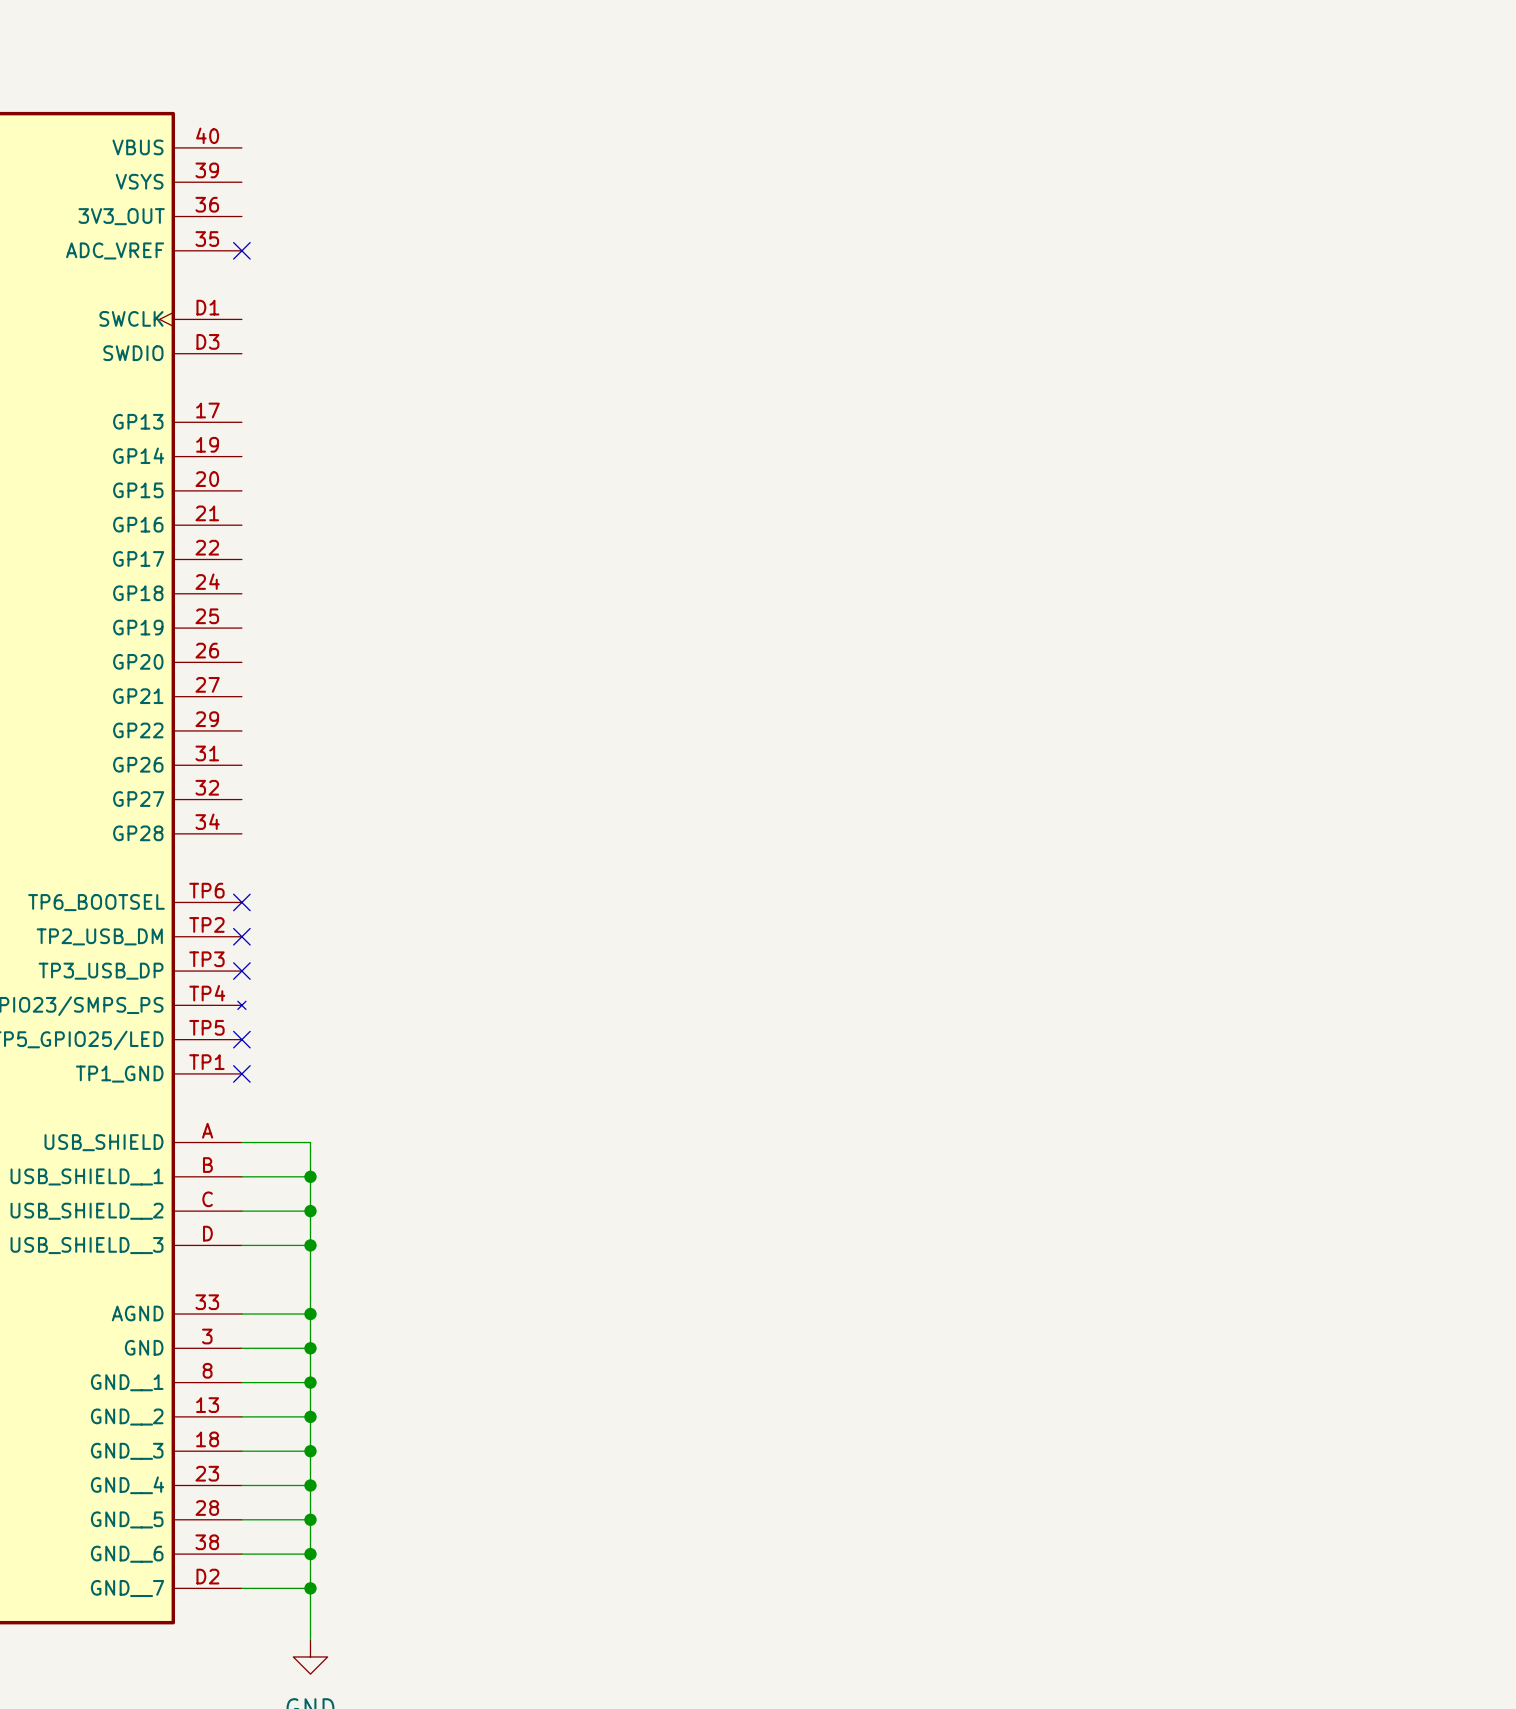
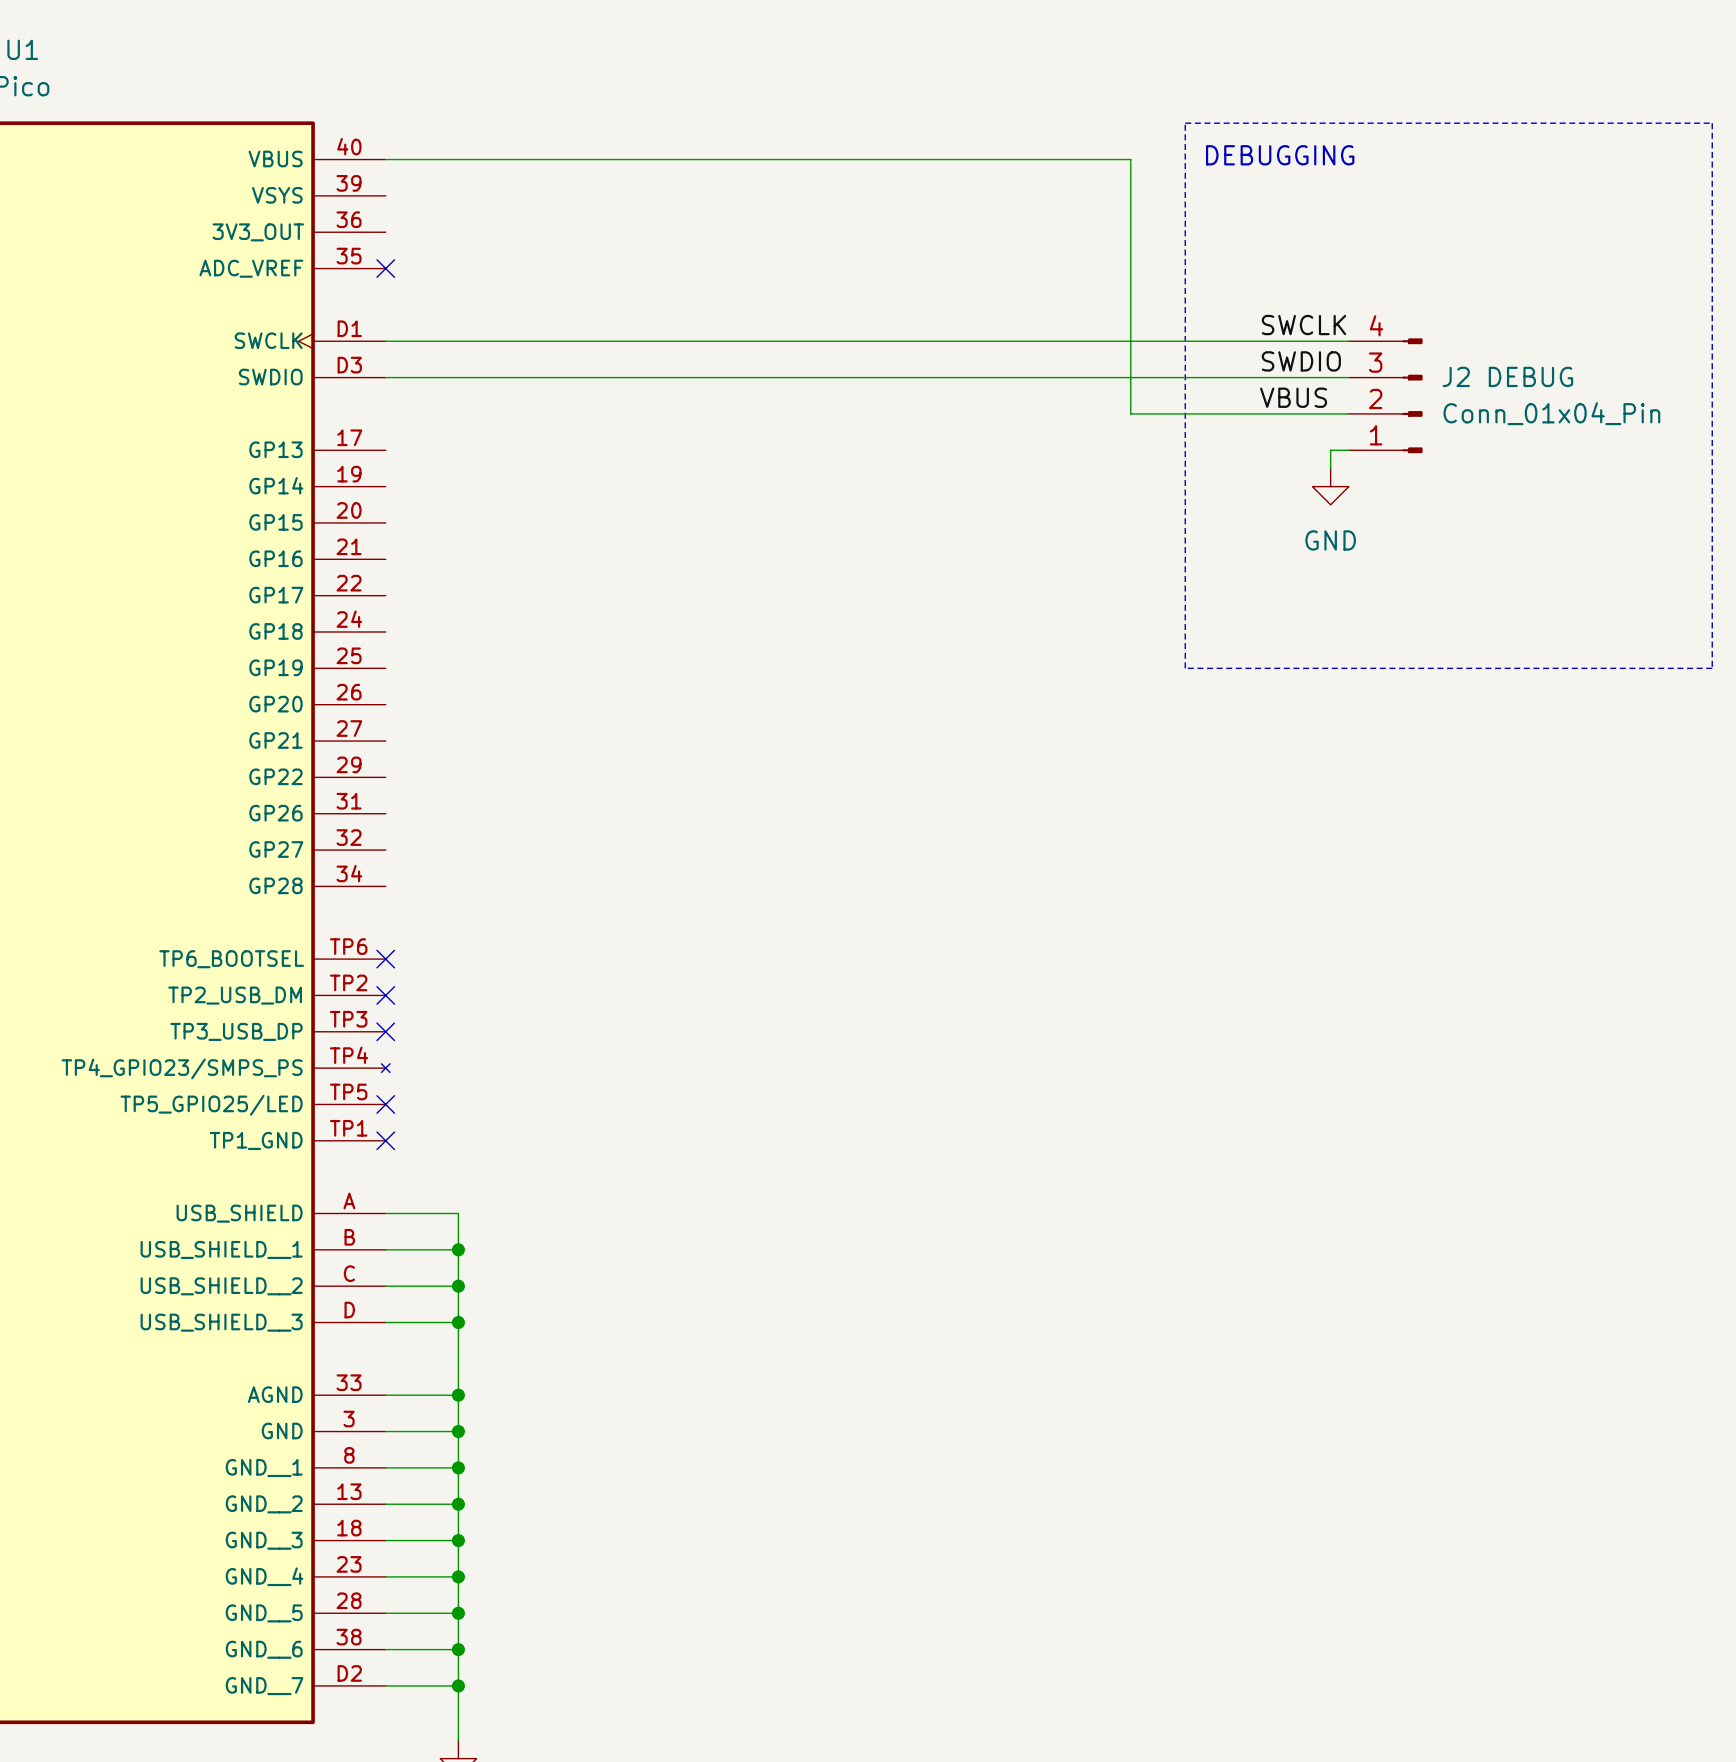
line: none -> (1185, 123) (1712, 123) (1712, 668) (1185, 668) (1185, 123)
text: none -> DEBUGGING (1280, 155)
wire: none -> (385, 159) (1130, 159) (1130, 413) (1348, 413)
label: none -> SWCLK (1303, 325)
wire: none -> (385, 341) (1348, 341)
label: none -> SWDIO (1301, 361)
wire: none -> (385, 377) (1348, 377)
J2: none -> Conn_01x04_Pin (1385, 395)
label: none -> VBUS (1293, 397)
wire: none -> (1348, 450) (1330, 450) (1330, 468)
power symbol: none -> GND (1330, 486)

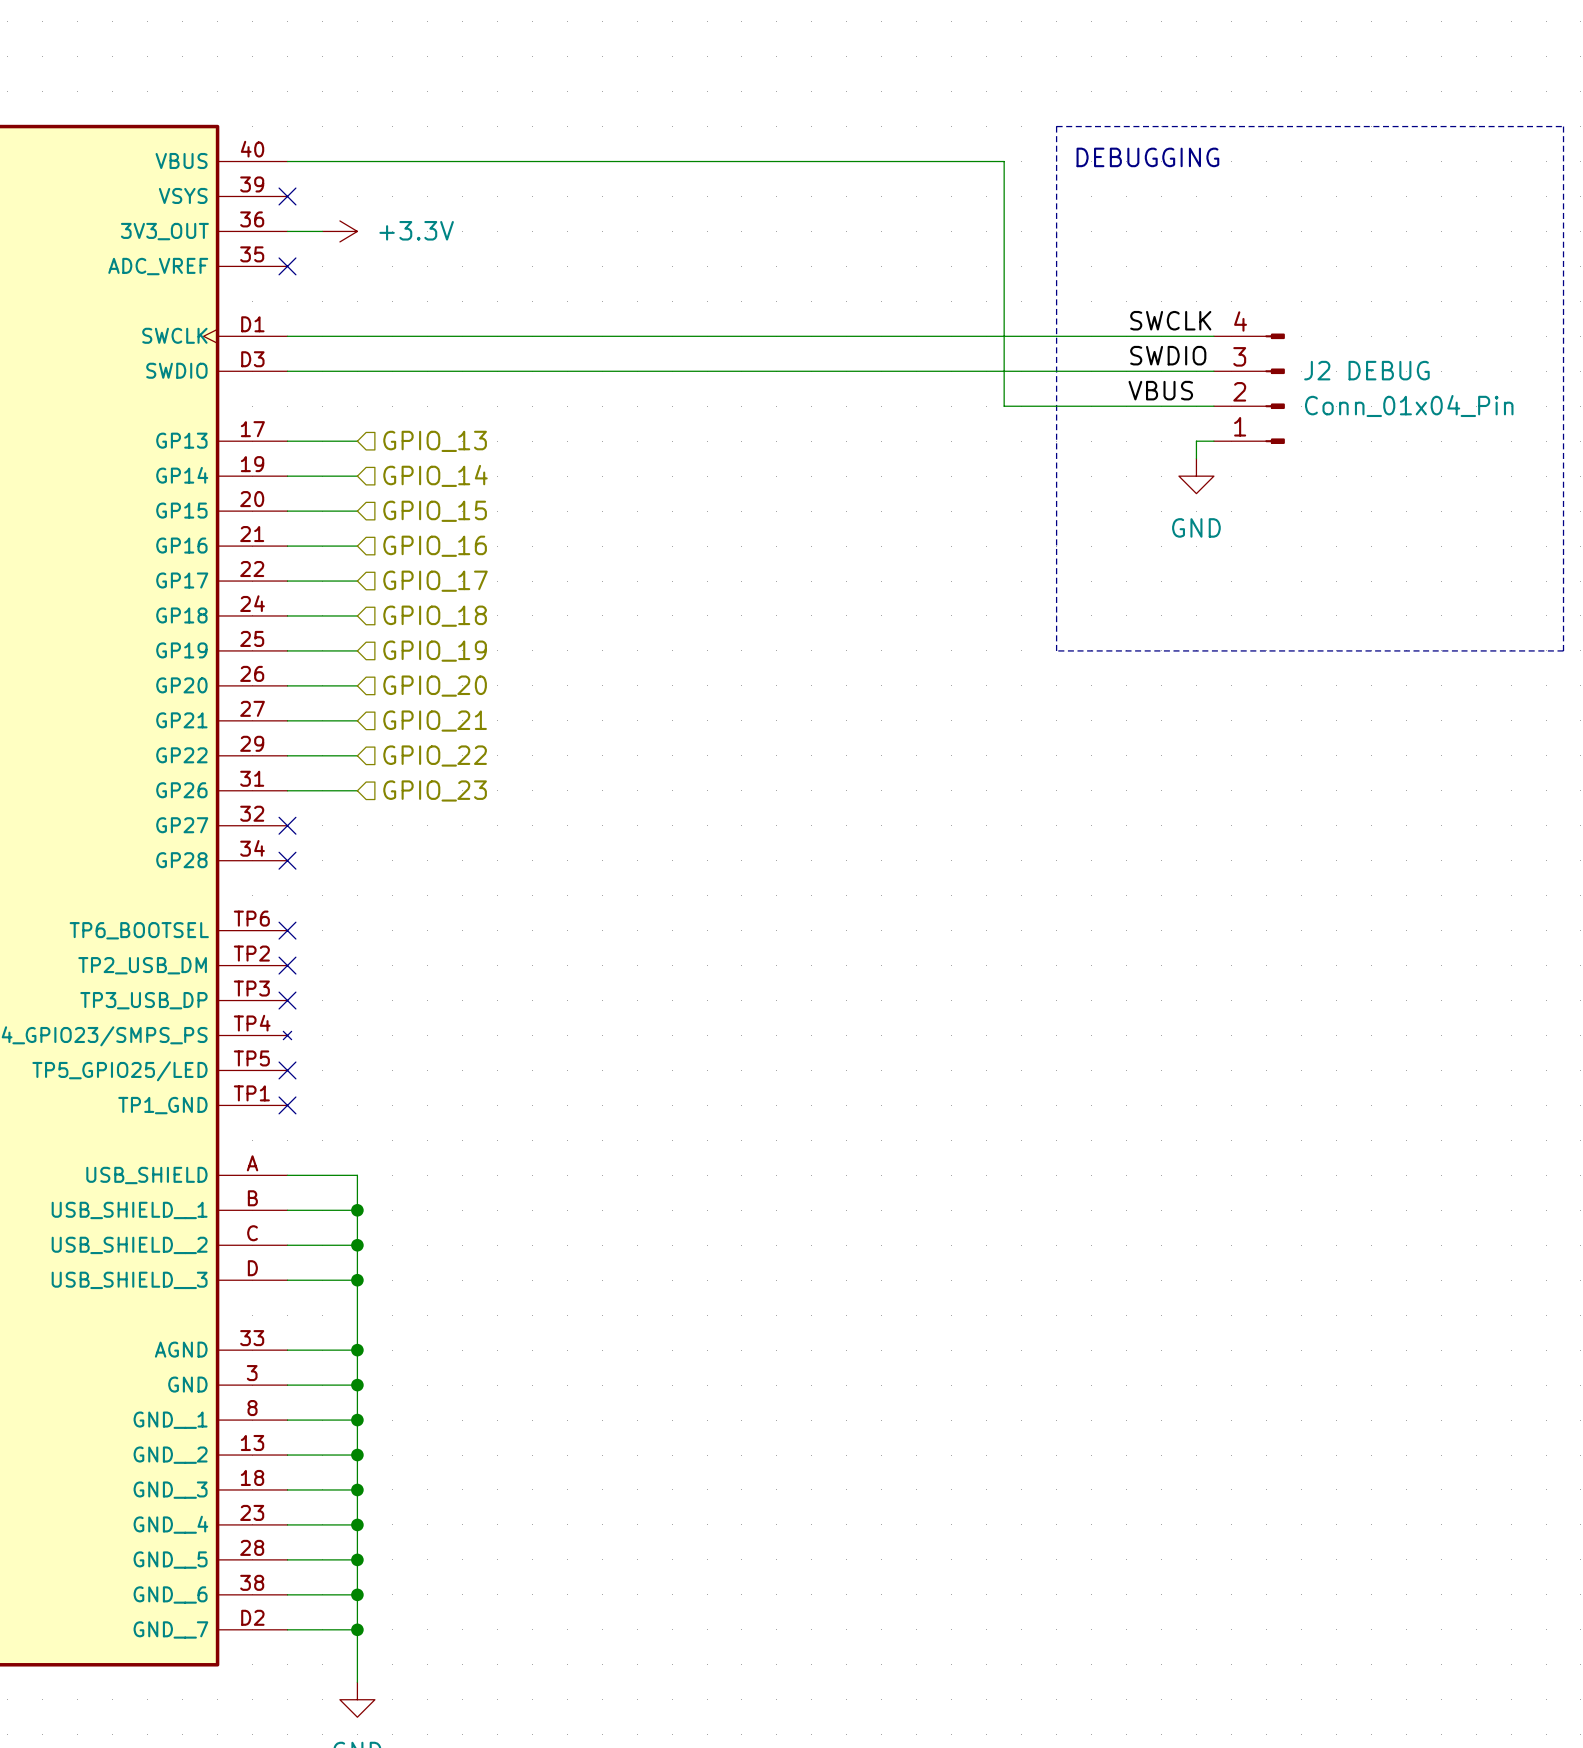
no-connect mark: none -> (287, 196)
wire: none -> (287, 231) (322, 231)
power symbol: none -> +3.3V (339, 231)
wire: none -> (287, 441) (357, 441)
hierarchical label: none -> GPIO_13 (435, 441)
wire: none -> (287, 476) (357, 476)
hierarchical label: none -> GPIO_14 (435, 475)
wire: none -> (287, 511) (357, 511)
hierarchical label: none -> GPIO_15 (435, 511)
wire: none -> (287, 546) (357, 546)
hierarchical label: none -> GPIO_16 (435, 546)
wire: none -> (287, 581) (357, 581)
hierarchical label: none -> GPIO_17 (435, 581)
wire: none -> (287, 615) (357, 615)
hierarchical label: none -> GPIO_18 (435, 616)
wire: none -> (287, 650) (357, 650)
hierarchical label: none -> GPIO_19 (435, 651)
wire: none -> (287, 685) (357, 685)
hierarchical label: none -> GPIO_20 (435, 686)
wire: none -> (287, 720) (357, 720)
hierarchical label: none -> GPIO_21 (435, 721)
wire: none -> (287, 755) (357, 755)
hierarchical label: none -> GPIO_22 (435, 756)
wire: none -> (287, 790) (357, 790)
hierarchical label: none -> GPIO_23 (435, 790)
no-connect mark: none -> (287, 825)
no-connect mark: none -> (287, 860)

